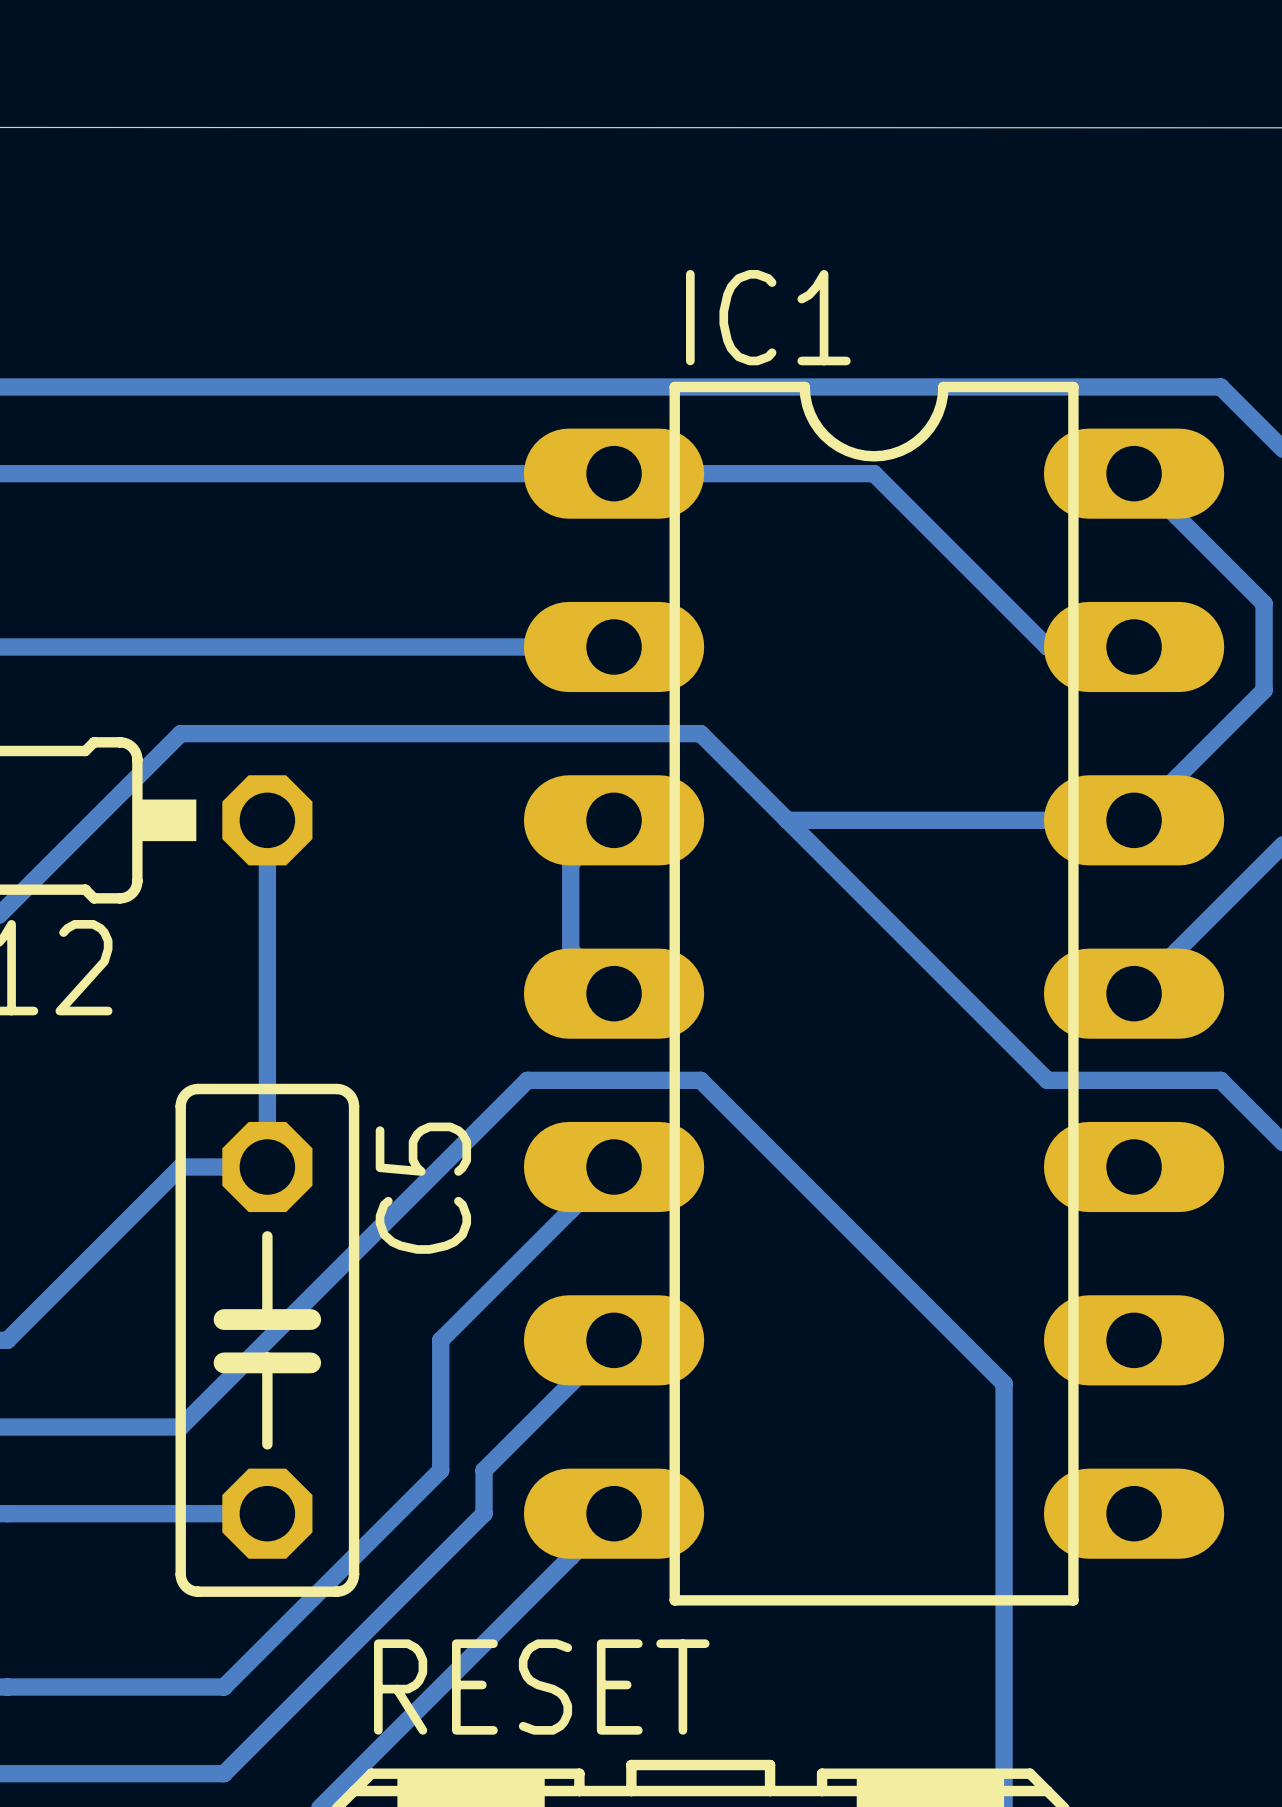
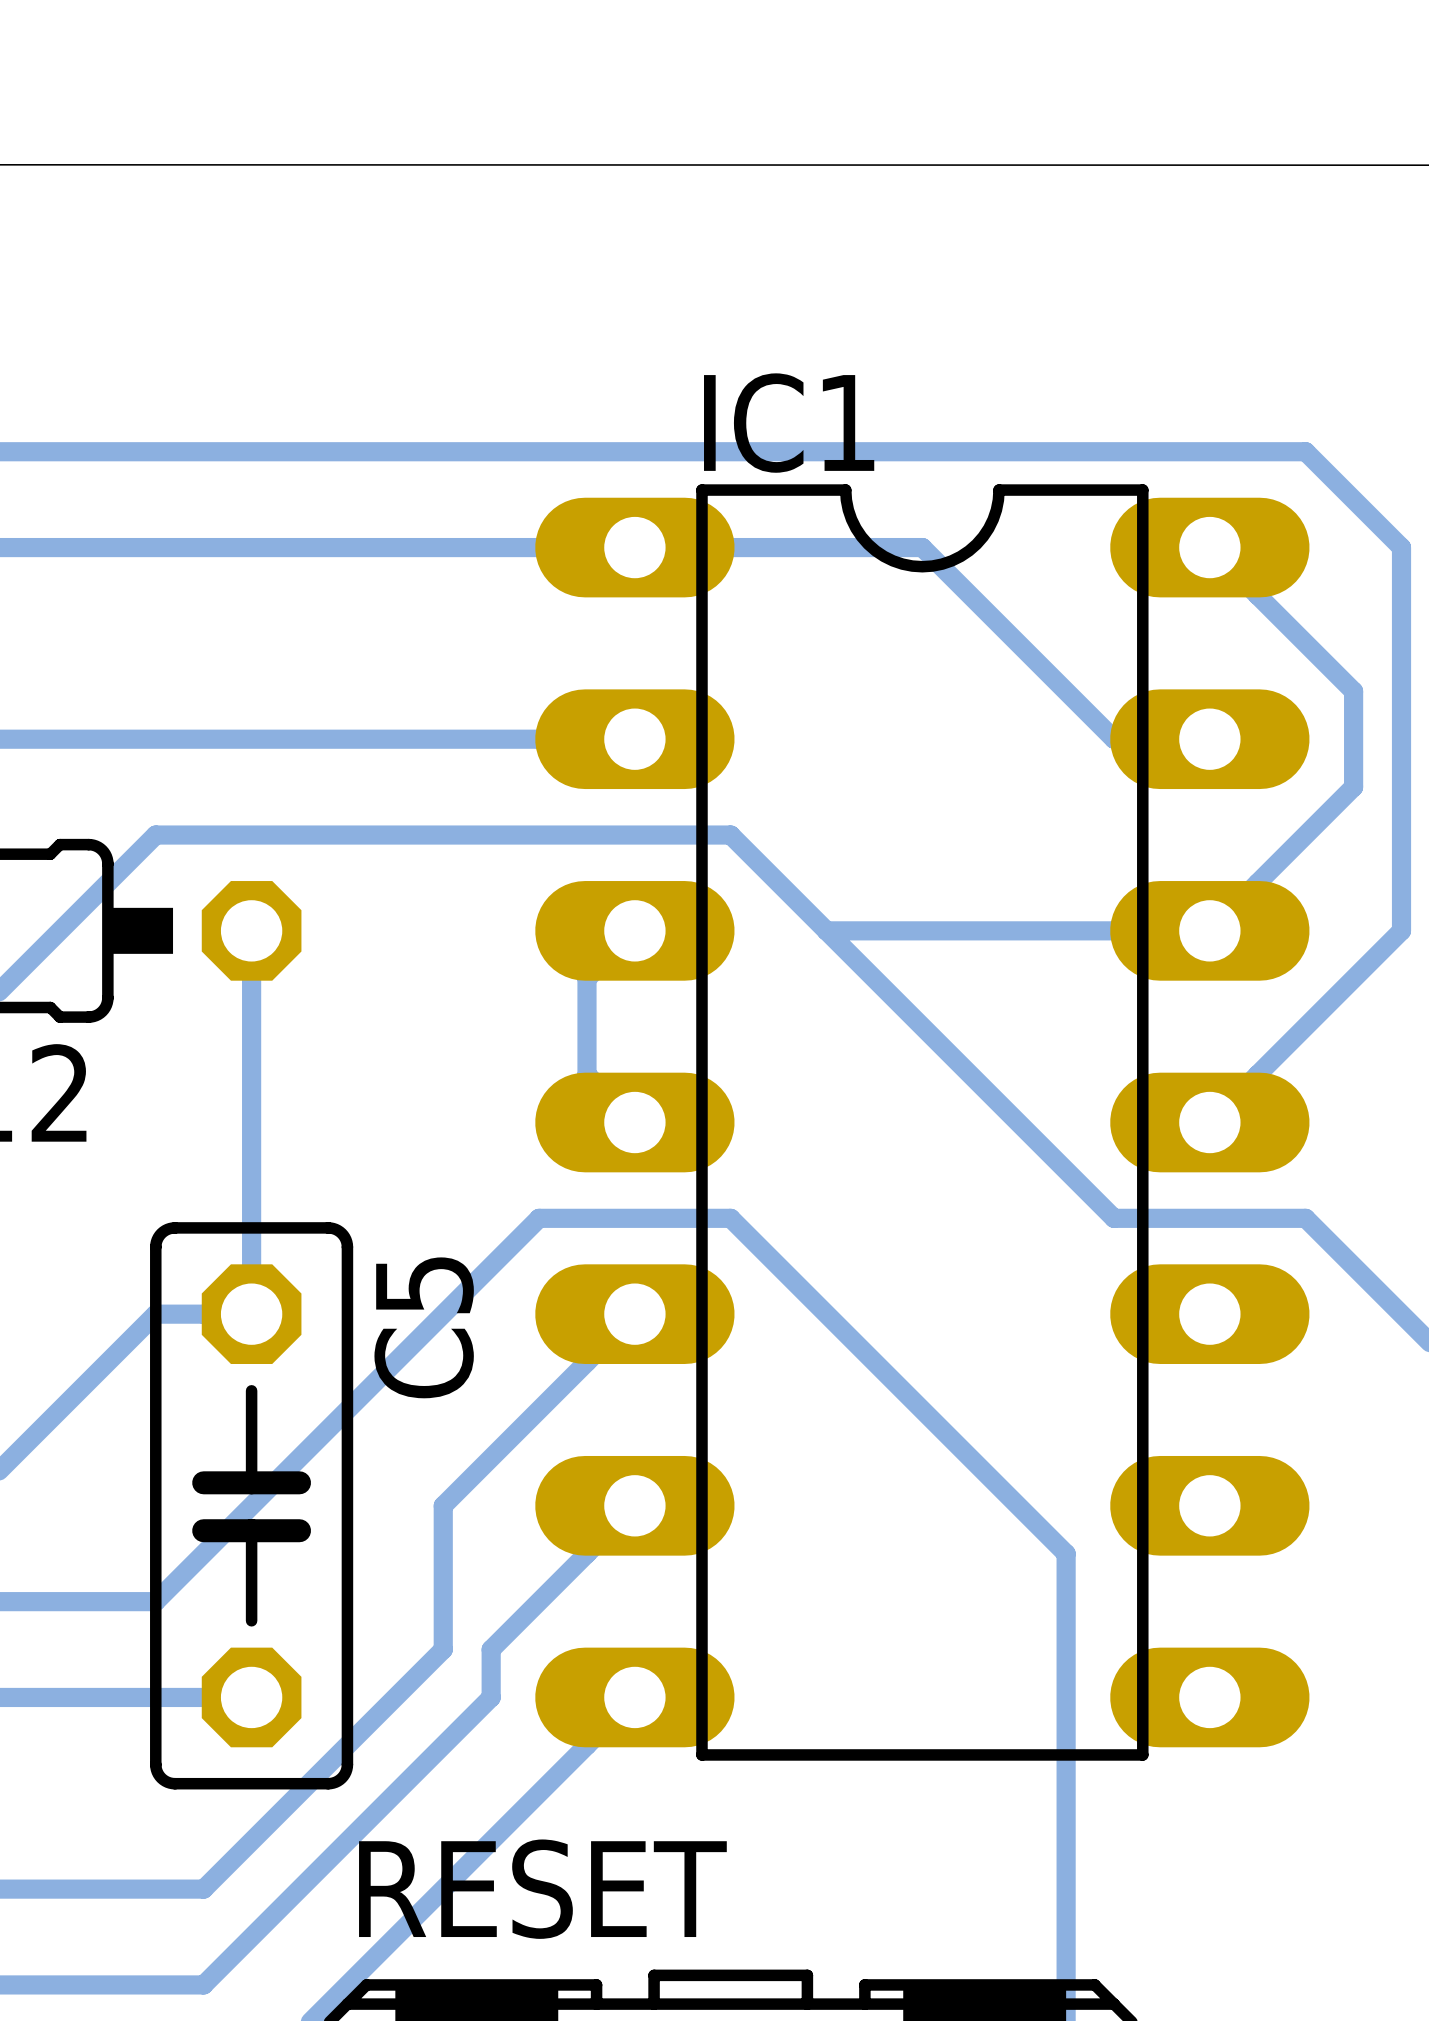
IC1 name position: IC1 (768, 317) -> IC1 (789, 423)
IC1 footprint: [523, 381, 1225, 1606] -> [535, 484, 1310, 1761]

